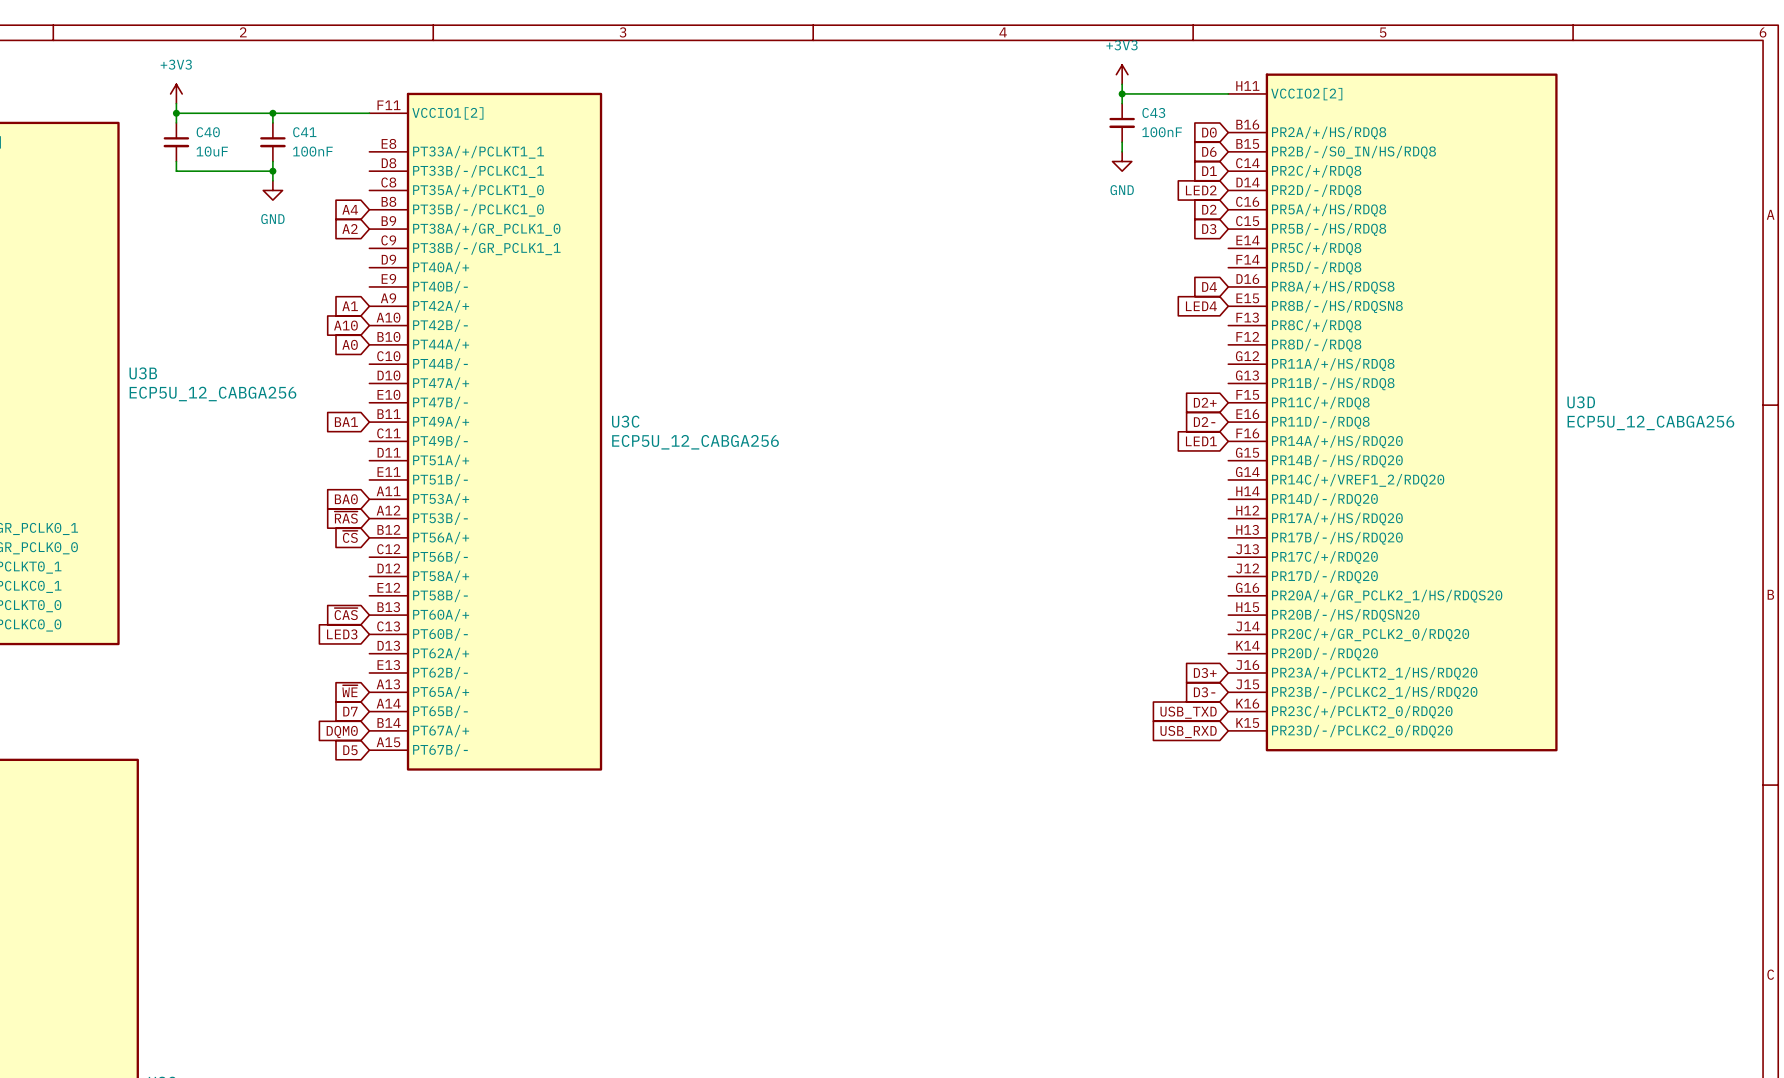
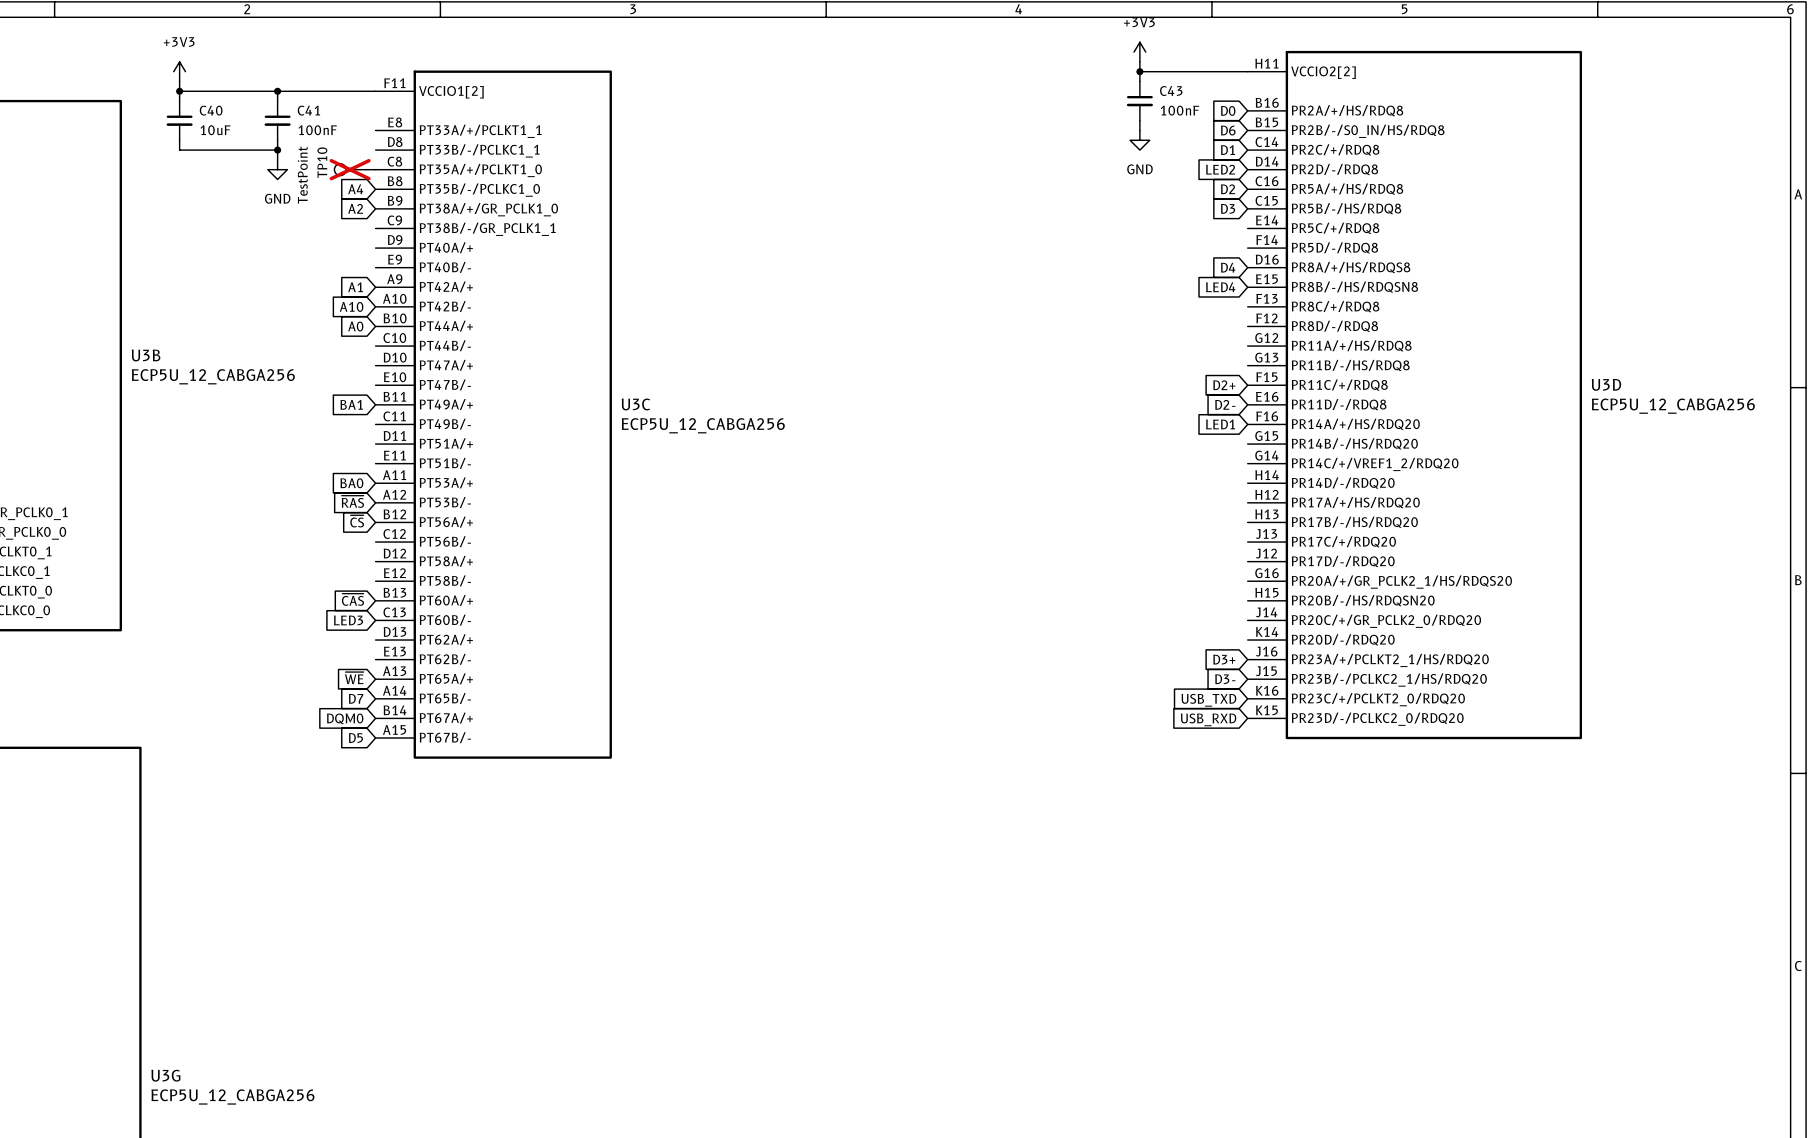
TP10: none -> TestPoint (350, 169)
wire: none -> (365, 169) (375, 169)

